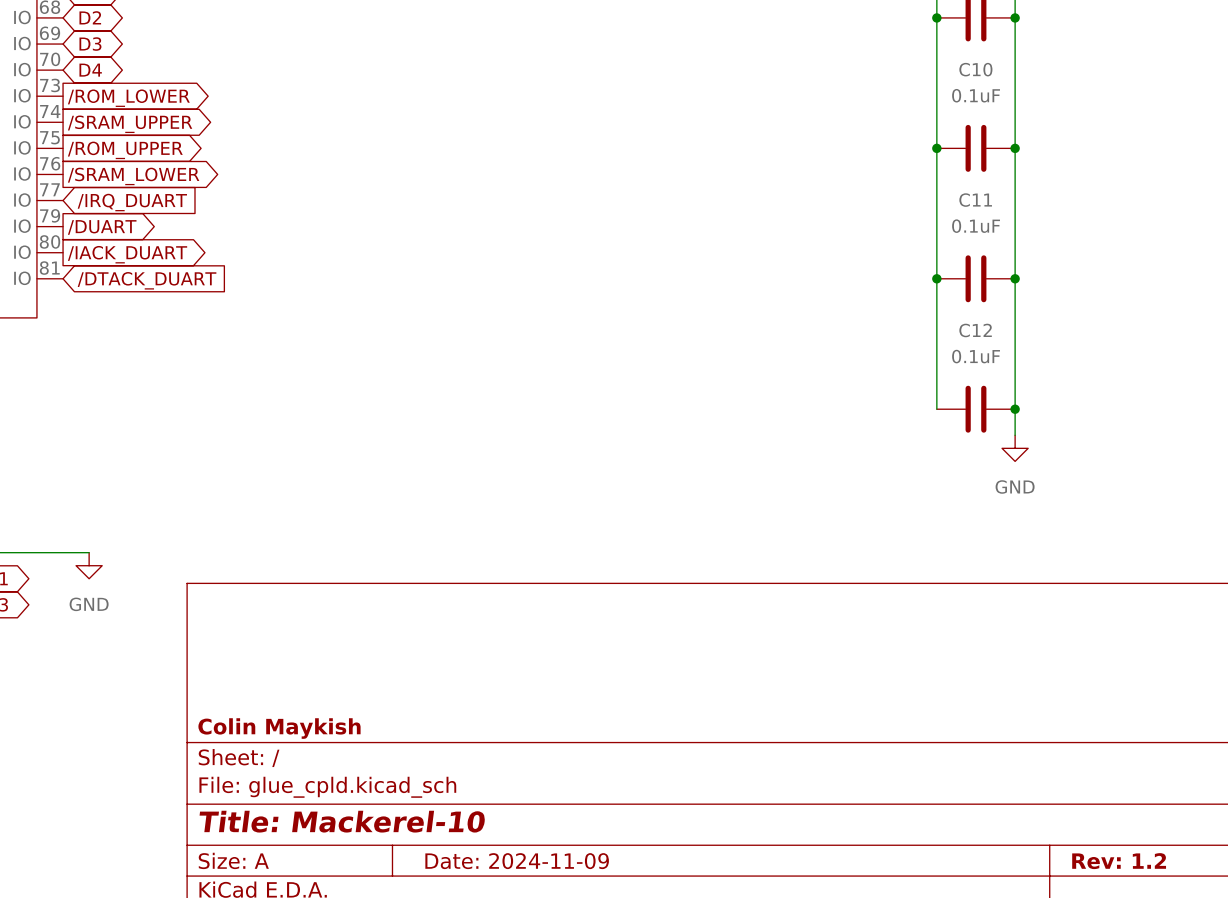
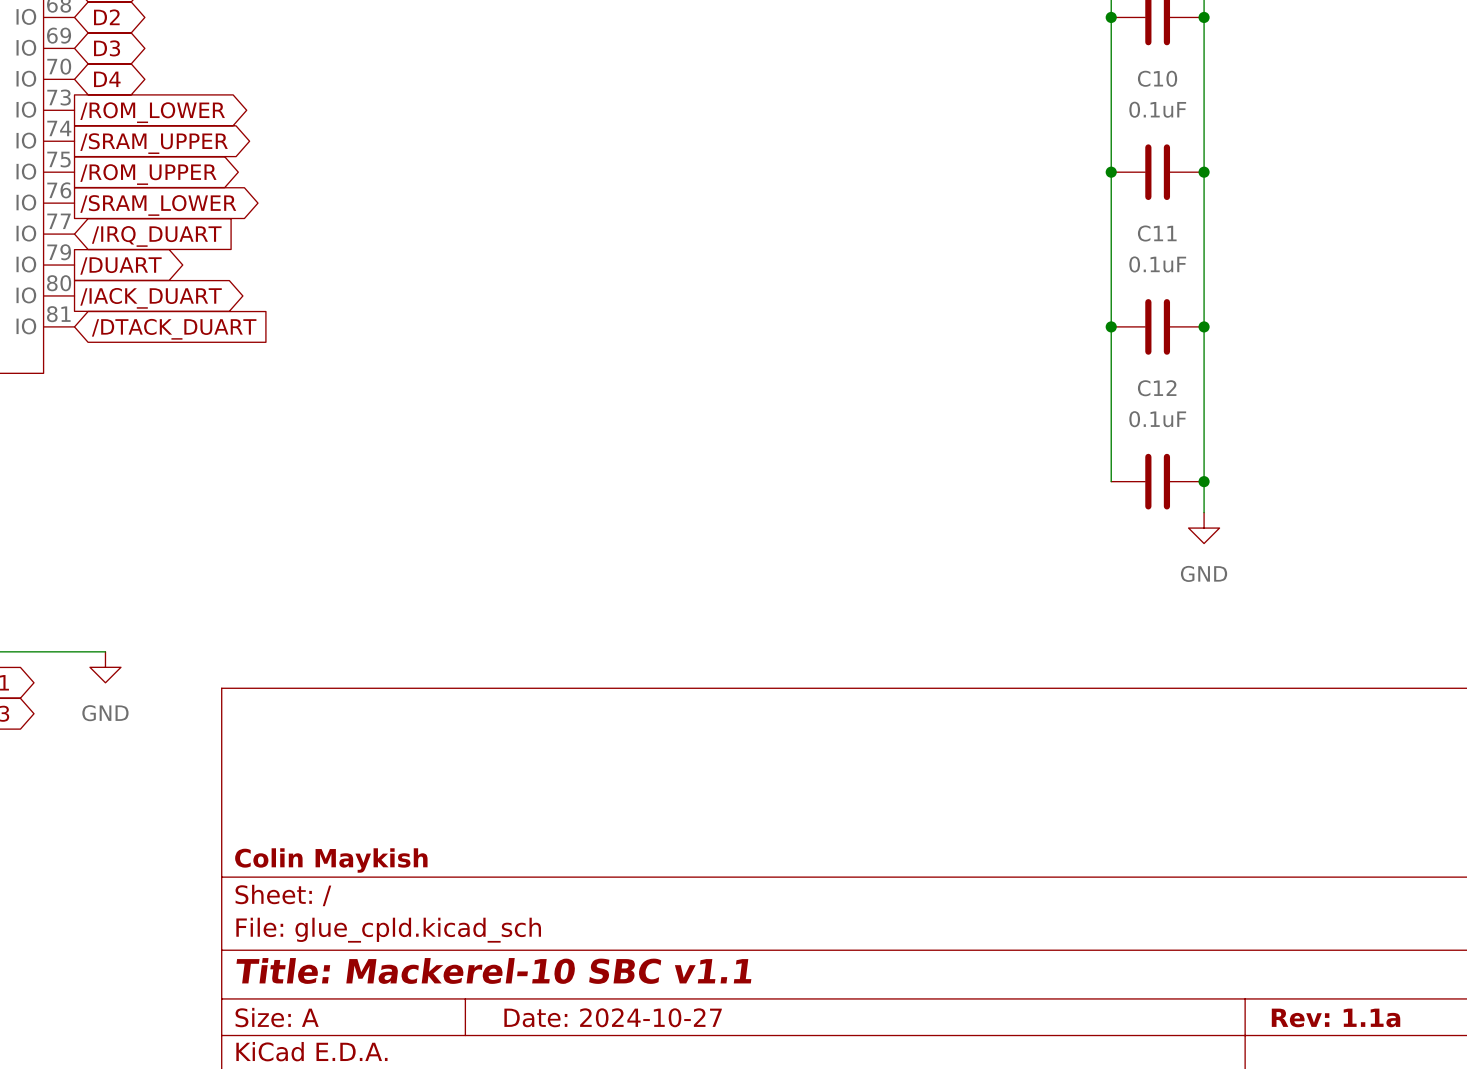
title block: Title: Mackerel-10 (342, 821) -> Title: Mackerel-10 SBC v1.1 (493, 970)
title block: Date: 2024-11-09 (517, 861) -> Date: 2024-10-27 (613, 1017)
title block: Rev: 1.2 (1119, 861) -> Rev: 1.1a (1336, 1017)

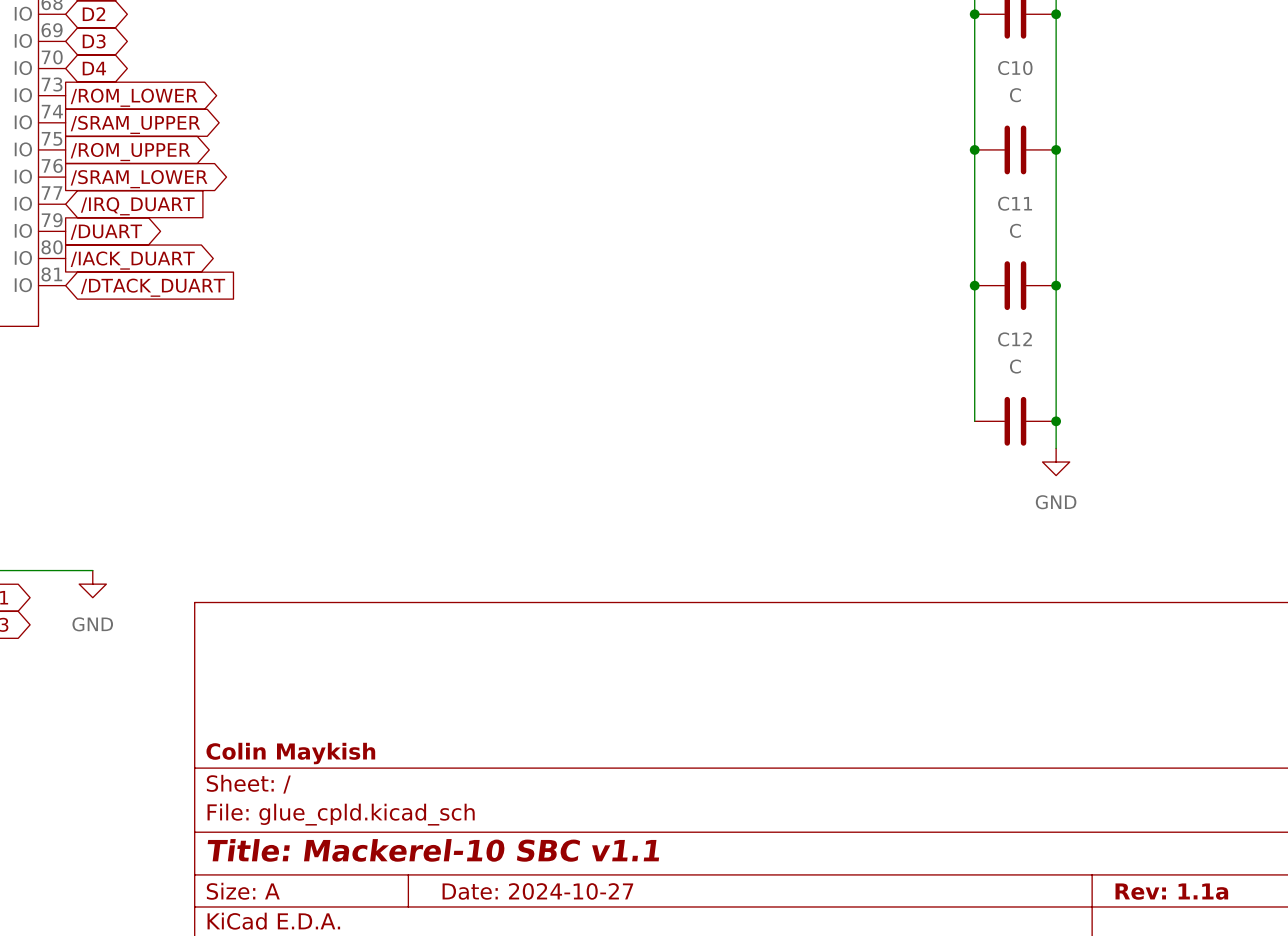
C10 value: 0.1uF (1157, 109) -> C (1015, 95)
C11 value: 0.1uF (1157, 264) -> C (1015, 230)
C12 value: 0.1uF (1157, 419) -> C (1015, 366)

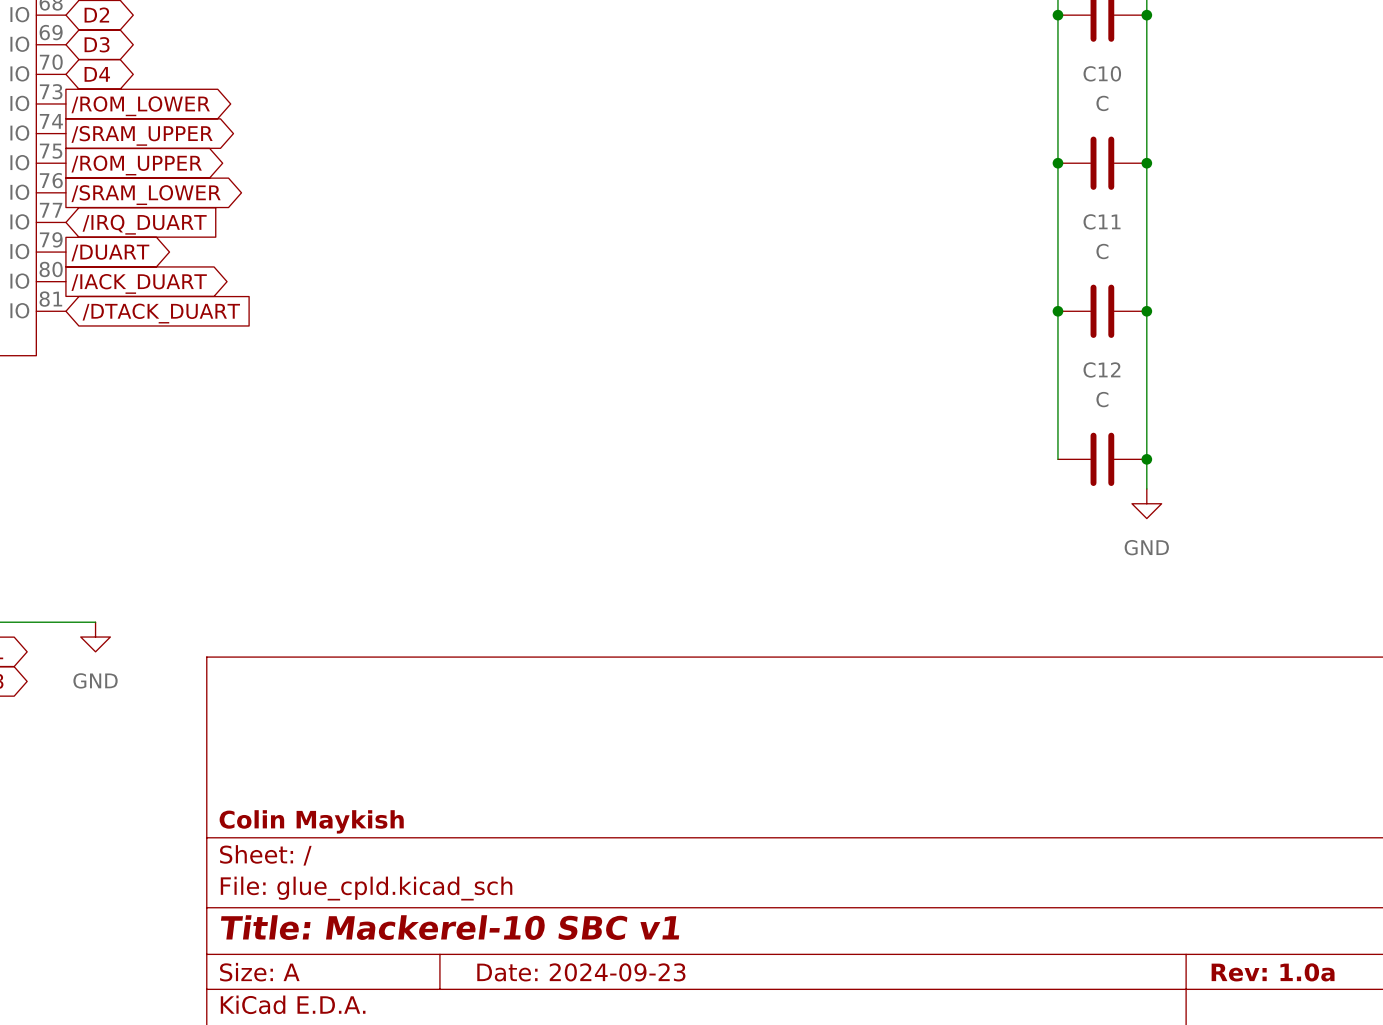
title block: Title: Mackerel-10 SBC v1.1 (433, 850) -> Title: Mackerel-10 SBC v1 (450, 927)
title block: Date: 2024-10-27 (537, 891) -> Date: 2024-09-23 (581, 972)
title block: Rev: 1.1a (1171, 891) -> Rev: 1.0a (1273, 972)

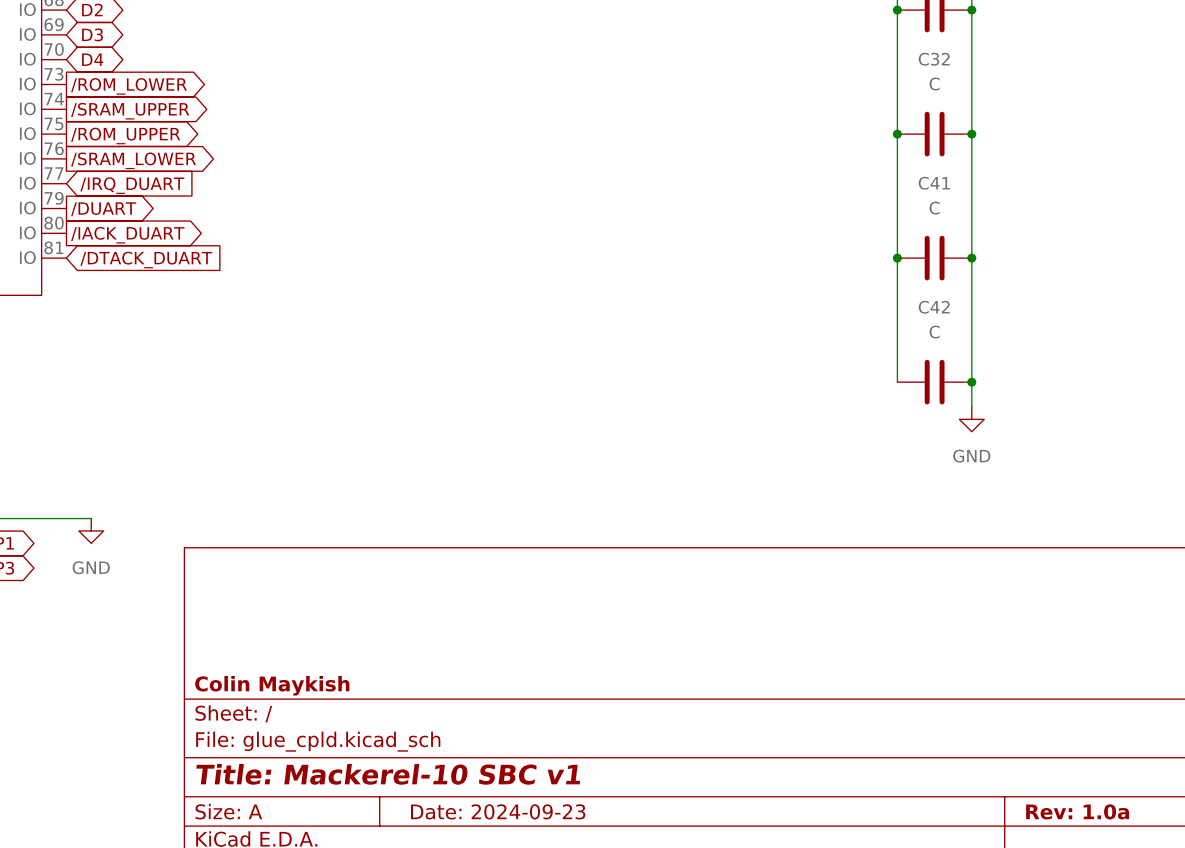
C10 name: C10 (1102, 73) -> C32 (934, 59)
C11 name: C11 (1102, 221) -> C41 (934, 183)
C12 name: C12 (1101, 369) -> C42 (934, 307)

